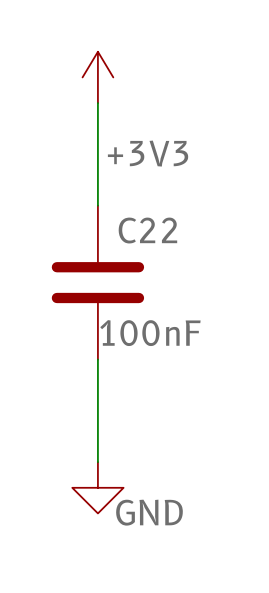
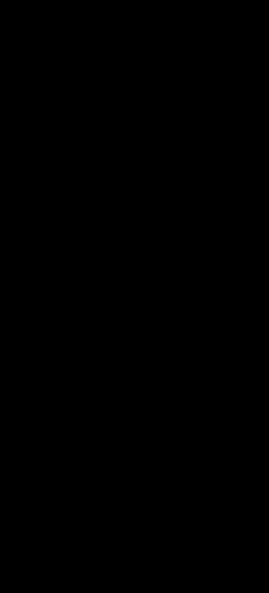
power symbol: +3V3 (97, 77) -> none
wire: (97, 103) (97, 205) -> none
C22: 100nF (97, 282) -> none
wire: (97, 359) (97, 462) -> none
power symbol: GND (97, 487) -> none

